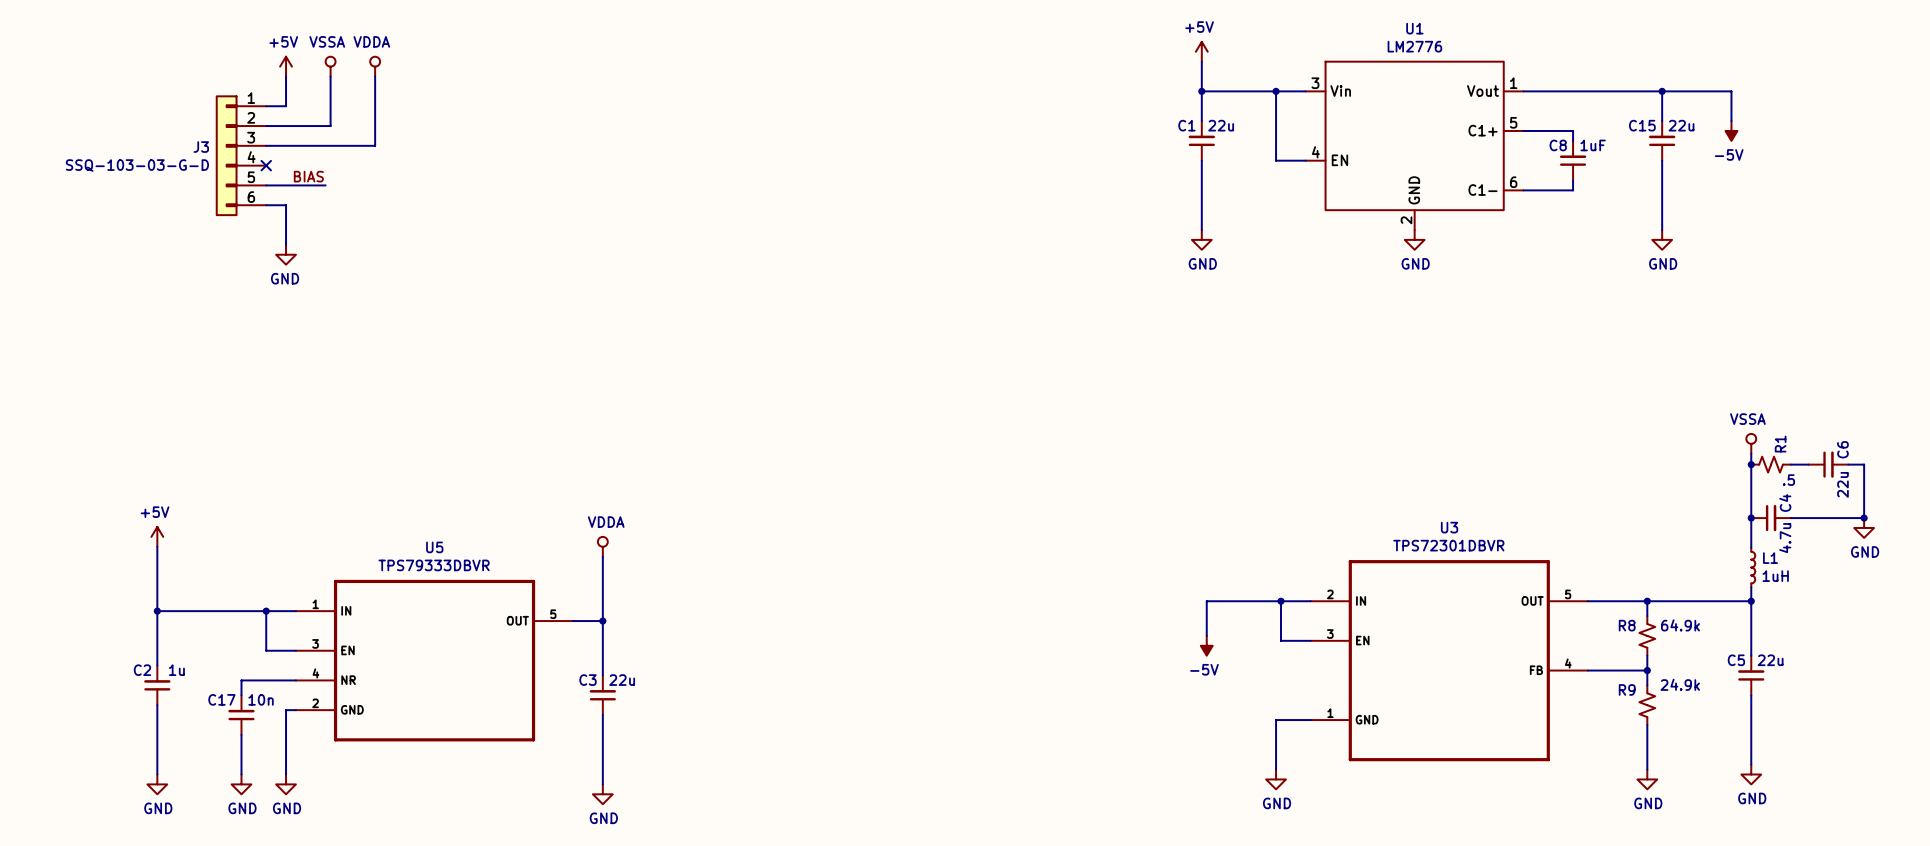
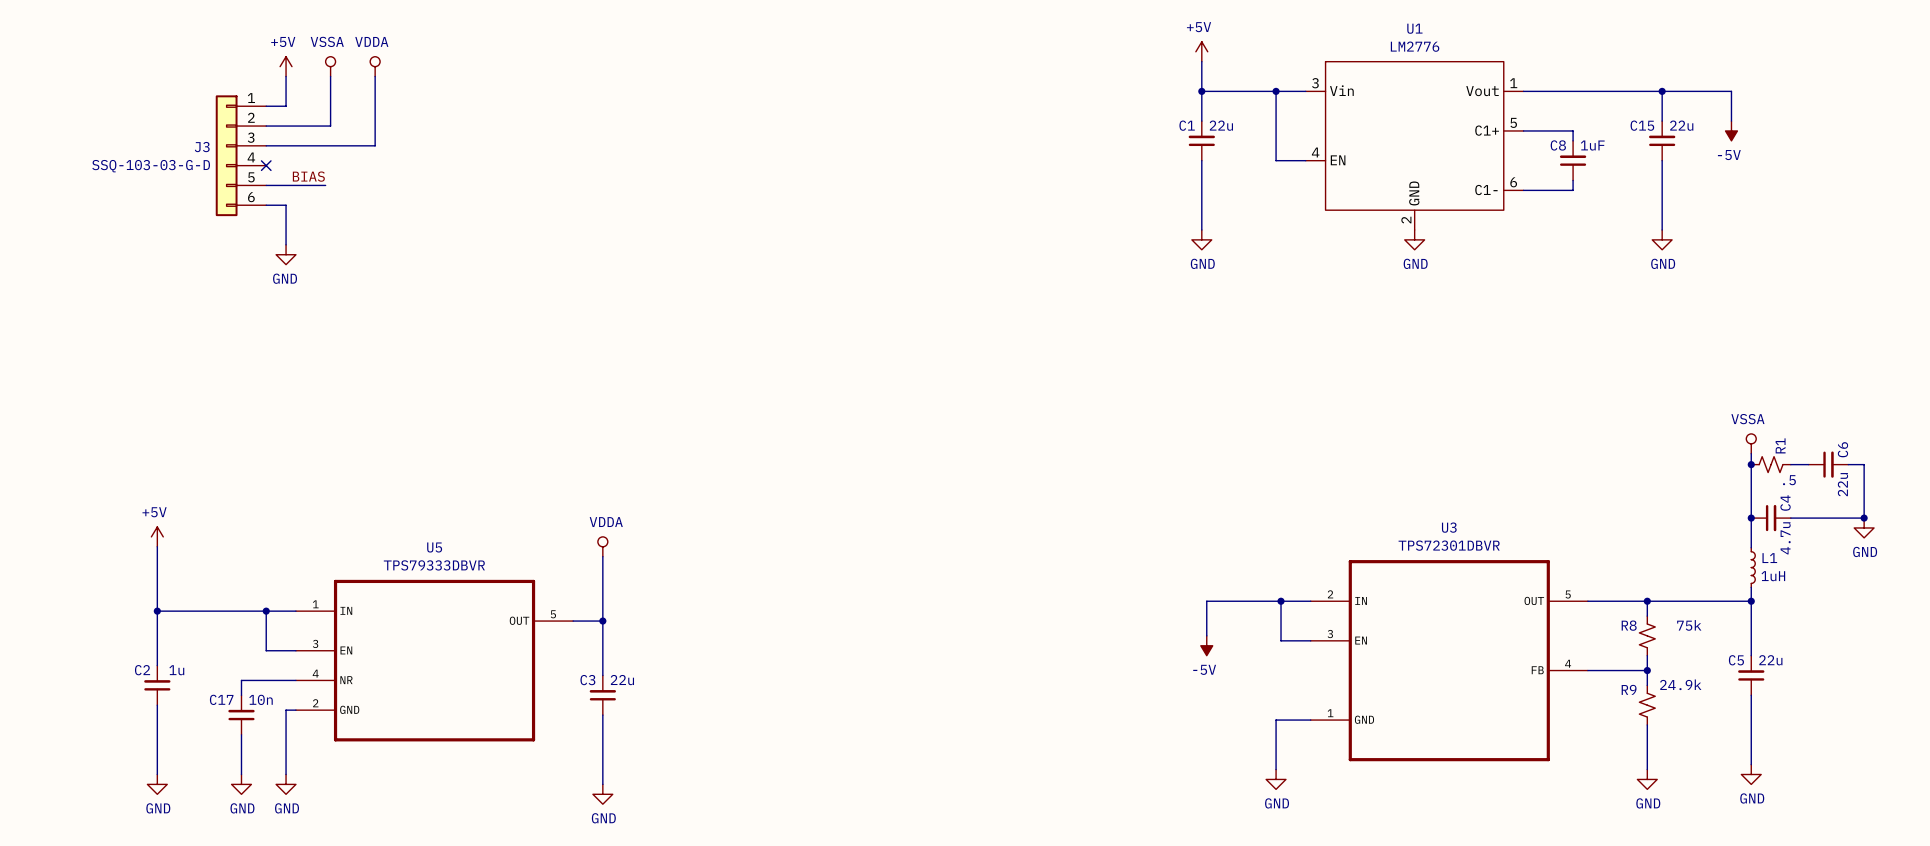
R8 value: 64.9k (1680, 625) -> 75k (1689, 625)

